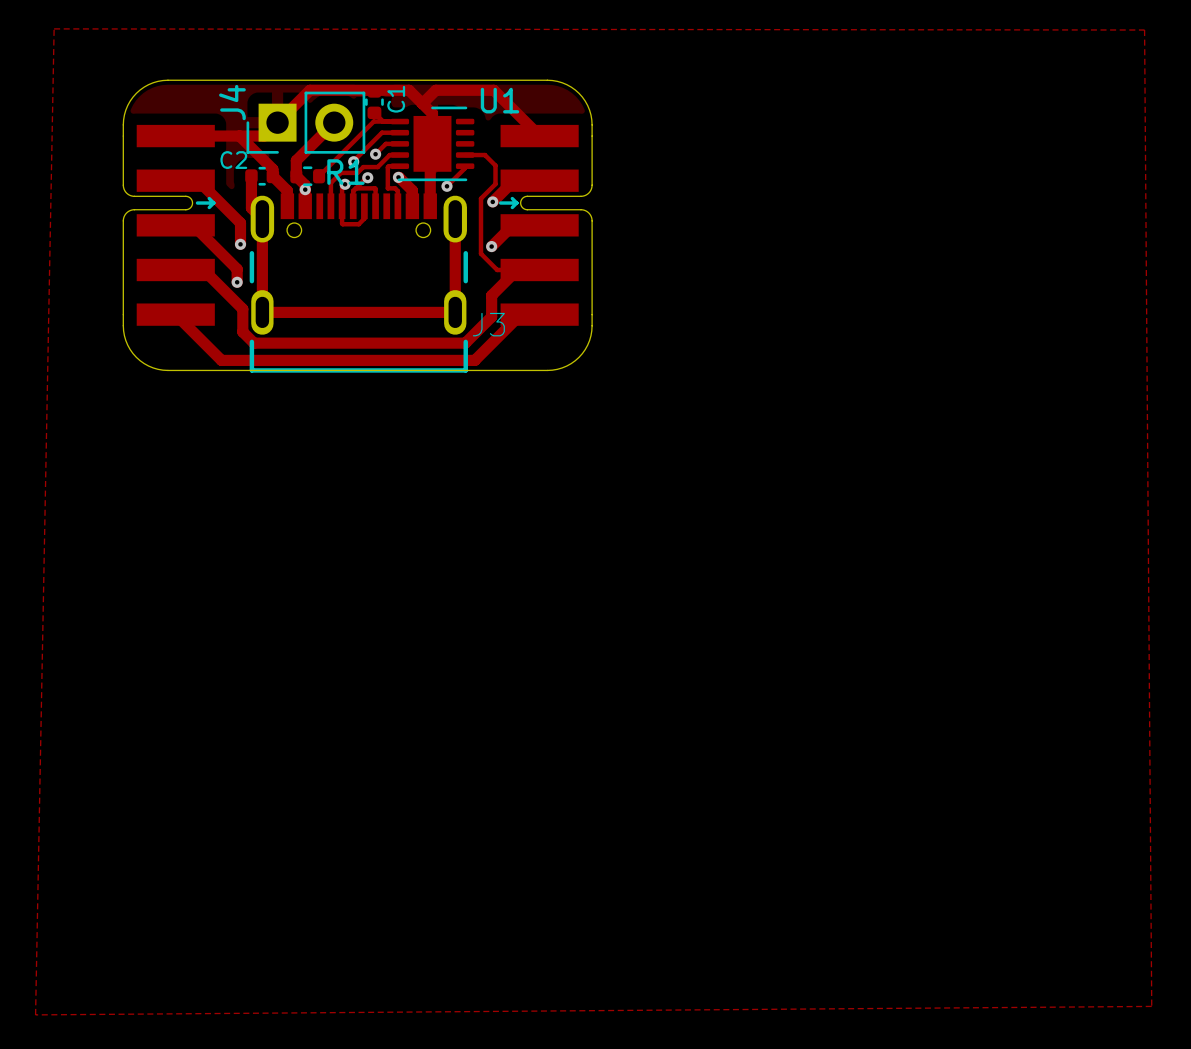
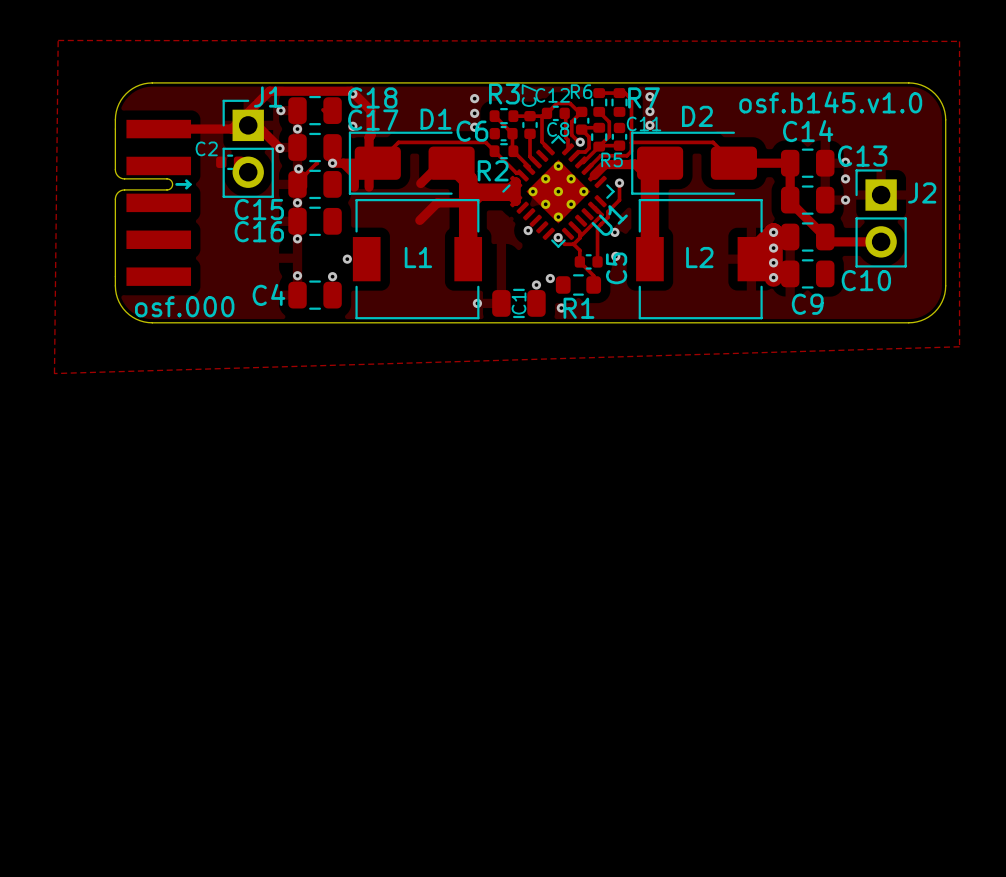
zone outline: (54, 28) (35, 1014) (1151, 1006) (1144, 30) -> (58, 40) (54, 373) (959, 346) (959, 41)
board edge: (547, 80) (566, 84) (582, 97) (590, 114) (592, 136) -> (465, 82) (912, 83) (924, 86) (934, 93) (942, 103) (945, 119) (945, 290) (940, 305) (924, 319) (908, 322) (465, 322)
C1 footprint: [365, 85, 384, 120] -> [492, 288, 546, 319]
track: none -> (599, 93) (625, 93) (631, 99) (631, 151) (626, 155) (600, 155) (587, 168)
via: none -> (352, 94)
via: none -> (649, 96)
via: none -> (474, 98)
U1 name position: U1 (499, 100) -> U1 (609, 220)
track: (422, 103) (435, 90) (493, 90) (539, 136) -> none
R6: none -> (599, 102)
R7: none -> (619, 102)
text: none -> osf.b145.v1.0 (830, 102)
U1 footprint: [390, 106, 475, 182] -> [502, 135, 615, 248]
via: none -> (280, 110)
C18: none -> (315, 110)
via: none -> (649, 111)
track: none -> (599, 111) (609, 121) (609, 136) (583, 162) (581, 162)
via: none -> (474, 113)
C8: none -> (555, 113)
track: none -> (564, 113) (568, 149)
track: none -> (494, 116) (512, 133) (512, 150) (529, 168)
R3: none -> (503, 116)
track: none -> (513, 116) (544, 116) (556, 103) (570, 103) (578, 111) (581, 111) (571, 121) (571, 135) (580, 142)
track: none -> (542, 116) (542, 141) (548, 149)
track: (399, 121) (373, 121) (319, 176) -> none
J4: (305, 122) -> none
track: (334, 122) (296, 160) (296, 176) (305, 185) (305, 206) -> none
C12: none -> (581, 120)
C7: none -> (530, 125)
via: none -> (649, 125)
track: (399, 132) (382, 132) (353, 161) -> none
via: none -> (352, 126)
via: none -> (474, 127)
track: none -> (599, 127) (583, 127) (581, 129) (589, 136) (589, 148) (585, 151) (578, 151) (574, 155)
track: (239, 136) (272, 169) (272, 176) (287, 190) (287, 206) -> none
track: none -> (260, 129) (279, 148)
via: none -> (297, 129)
C6: none -> (503, 133)
track: none -> (530, 133) (530, 156) (535, 162)
track: (399, 143) (385, 143) (375, 154) -> none
R5: none -> (599, 137)
C11: none -> (619, 136)
via: none -> (580, 142)
track: none -> (631, 142) (713, 142) (733, 163) (790, 163) (790, 201) (830, 241) (881, 241)
via: (375, 154) -> none
track: (399, 155) (389, 155) (377, 167) (363, 167) (357, 172) (340, 172) (330, 182) (330, 206) -> none
track: (465, 155) (484, 155) (495, 165) (495, 184) (480, 198) (480, 253) (497, 269) (539, 269) (517, 269) (491, 295) (491, 316) (465, 343) (253, 343) (242, 331) (242, 309) (203, 269) (175, 269) -> none
track: none -> (600, 145) (619, 145)
C17: none -> (315, 147)
J1: none -> (248, 148)
via: none -> (279, 148)
via: (353, 161) -> none
R2: none -> (503, 151)
R1 footprint: [290, 166, 326, 187] -> [555, 274, 602, 296]
track: (399, 166) (387, 167) (387, 188) (395, 188) (397, 191) (397, 206) -> none
track: (465, 166) (447, 186) -> none
R1 name position: R1 (345, 172) -> R1 (578, 308)
track: (251, 176) (251, 208) (262, 219) (262, 312) (455, 312) (455, 219) -> none
via: none -> (845, 162)
via: (367, 177) -> none
via: none -> (332, 163)
via: (398, 177) -> none
track: none -> (343, 163) (377, 163) (398, 142) (485, 142) (516, 173) (522, 175)
D1: none -> (411, 163)
D2: none -> (694, 163)
C14: none -> (807, 163)
track: (175, 180) (198, 180) (240, 223) (240, 244) -> none
track: (345, 184) (342, 187) (342, 223) (358, 224) (364, 218) (364, 206) -> none
via: (447, 186) -> none
track: (355, 188) (374, 188) (375, 206) -> none
via: (305, 189) -> none
track: none -> (649, 173) (649, 259) (649, 173)
track: none -> (594, 175) (605, 164) (635, 164) (649, 178)
via: none -> (845, 178)
track: none -> (470, 181) (470, 257) (468, 259) (468, 179) (451, 163) (476, 188) (510, 188) (516, 182) (516, 201) (511, 196) (480, 196) (470, 206)
via: (492, 201) -> none
track: none -> (619, 183) (619, 200) (608, 211) (608, 217) (597, 227) (597, 261)
via: none -> (619, 183)
C15: none -> (315, 184)
C13: none -> (807, 200)
via: none -> (845, 200)
track: (175, 225) (193, 225) (237, 269) (237, 282) -> none
via: none -> (297, 202)
part: (545, 225) -> none
track: none -> (594, 207) (601, 214) (579, 237)
via: (240, 244) -> none
J2: none -> (881, 218)
via: (491, 246) -> none
C16: none -> (315, 221)
track: none -> (574, 227) (579, 232) (579, 238) (573, 244)
via: none -> (528, 230)
via: none -> (614, 232)
via: none -> (773, 232)
C10: none -> (807, 237)
track: none -> (558, 237) (564, 244) (573, 244)
via: none -> (558, 237)
via: none -> (297, 238)
track: none -> (573, 244) (579, 250) (579, 261) (593, 275) (593, 284)
via: none -> (773, 248)
via: (237, 282) -> none
J3: (358, 283) -> none
via: none -> (615, 256)
via: none -> (347, 259)
L1: none -> (417, 259)
L2: none -> (700, 259)
track: none -> (751, 259) (751, 254) (773, 232) (773, 277)
C5: none -> (588, 261)
via: none -> (773, 262)
C9: none -> (807, 273)
via: none -> (297, 275)
track: (175, 314) (221, 360) (474, 360) (520, 314) (539, 314) -> none
via: none -> (332, 276)
board edge: (592, 314) (590, 335) (582, 353) (566, 366) (547, 370) -> none
via: none -> (773, 277)
via: none -> (550, 278)
via: none -> (536, 284)
C4: none -> (315, 295)
via: none -> (477, 303)
text: none -> osf.000 (184, 306)
via: none -> (561, 308)

